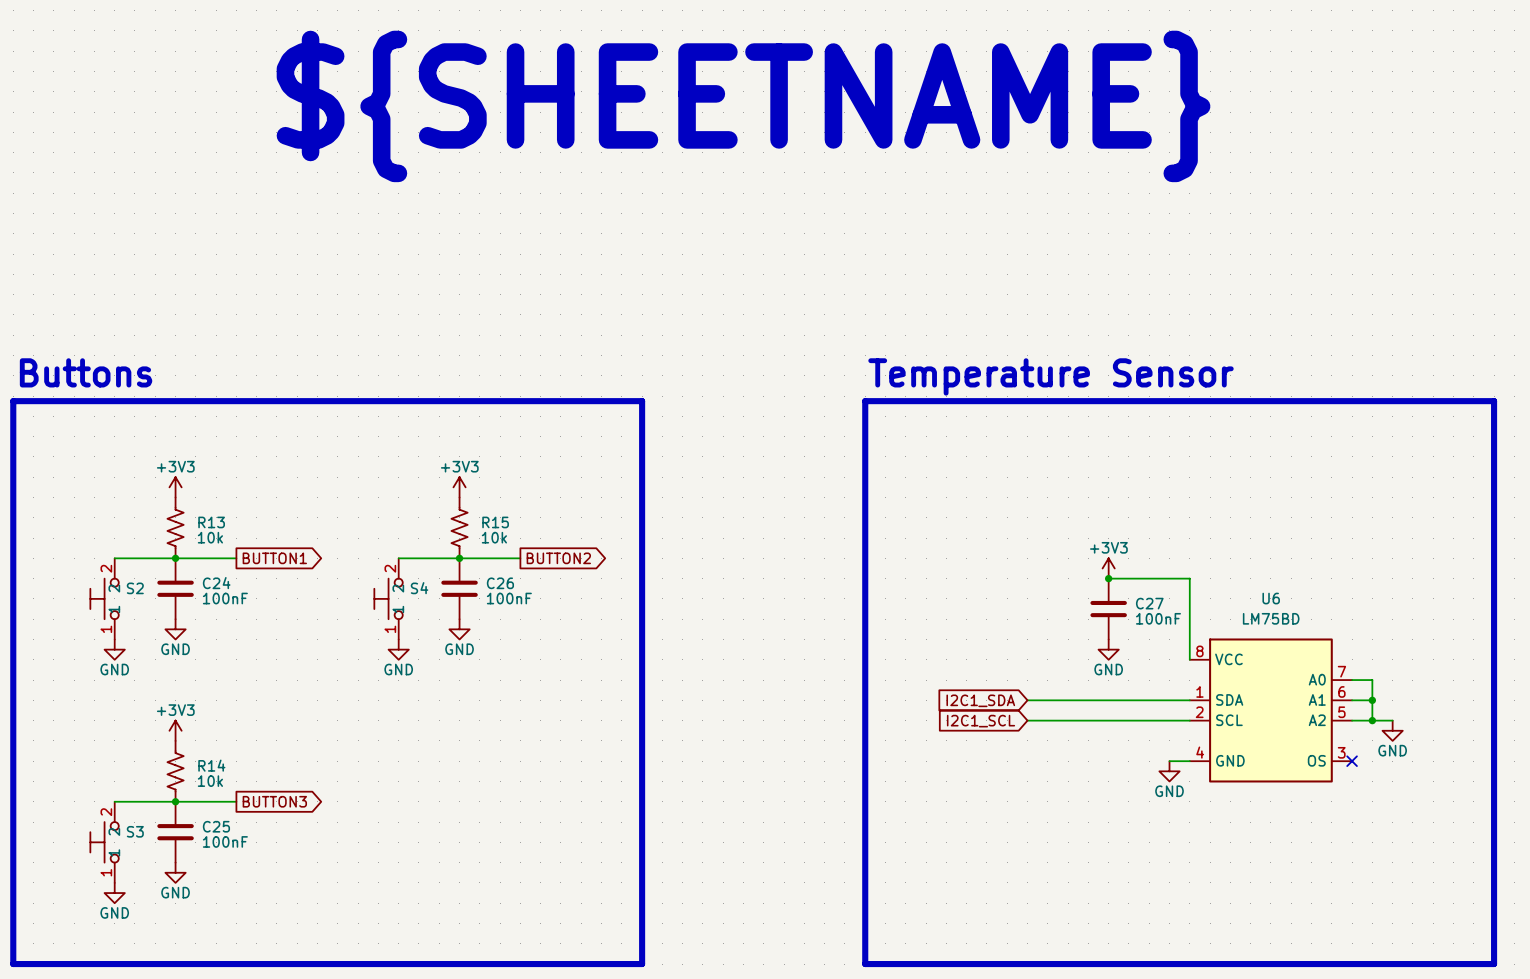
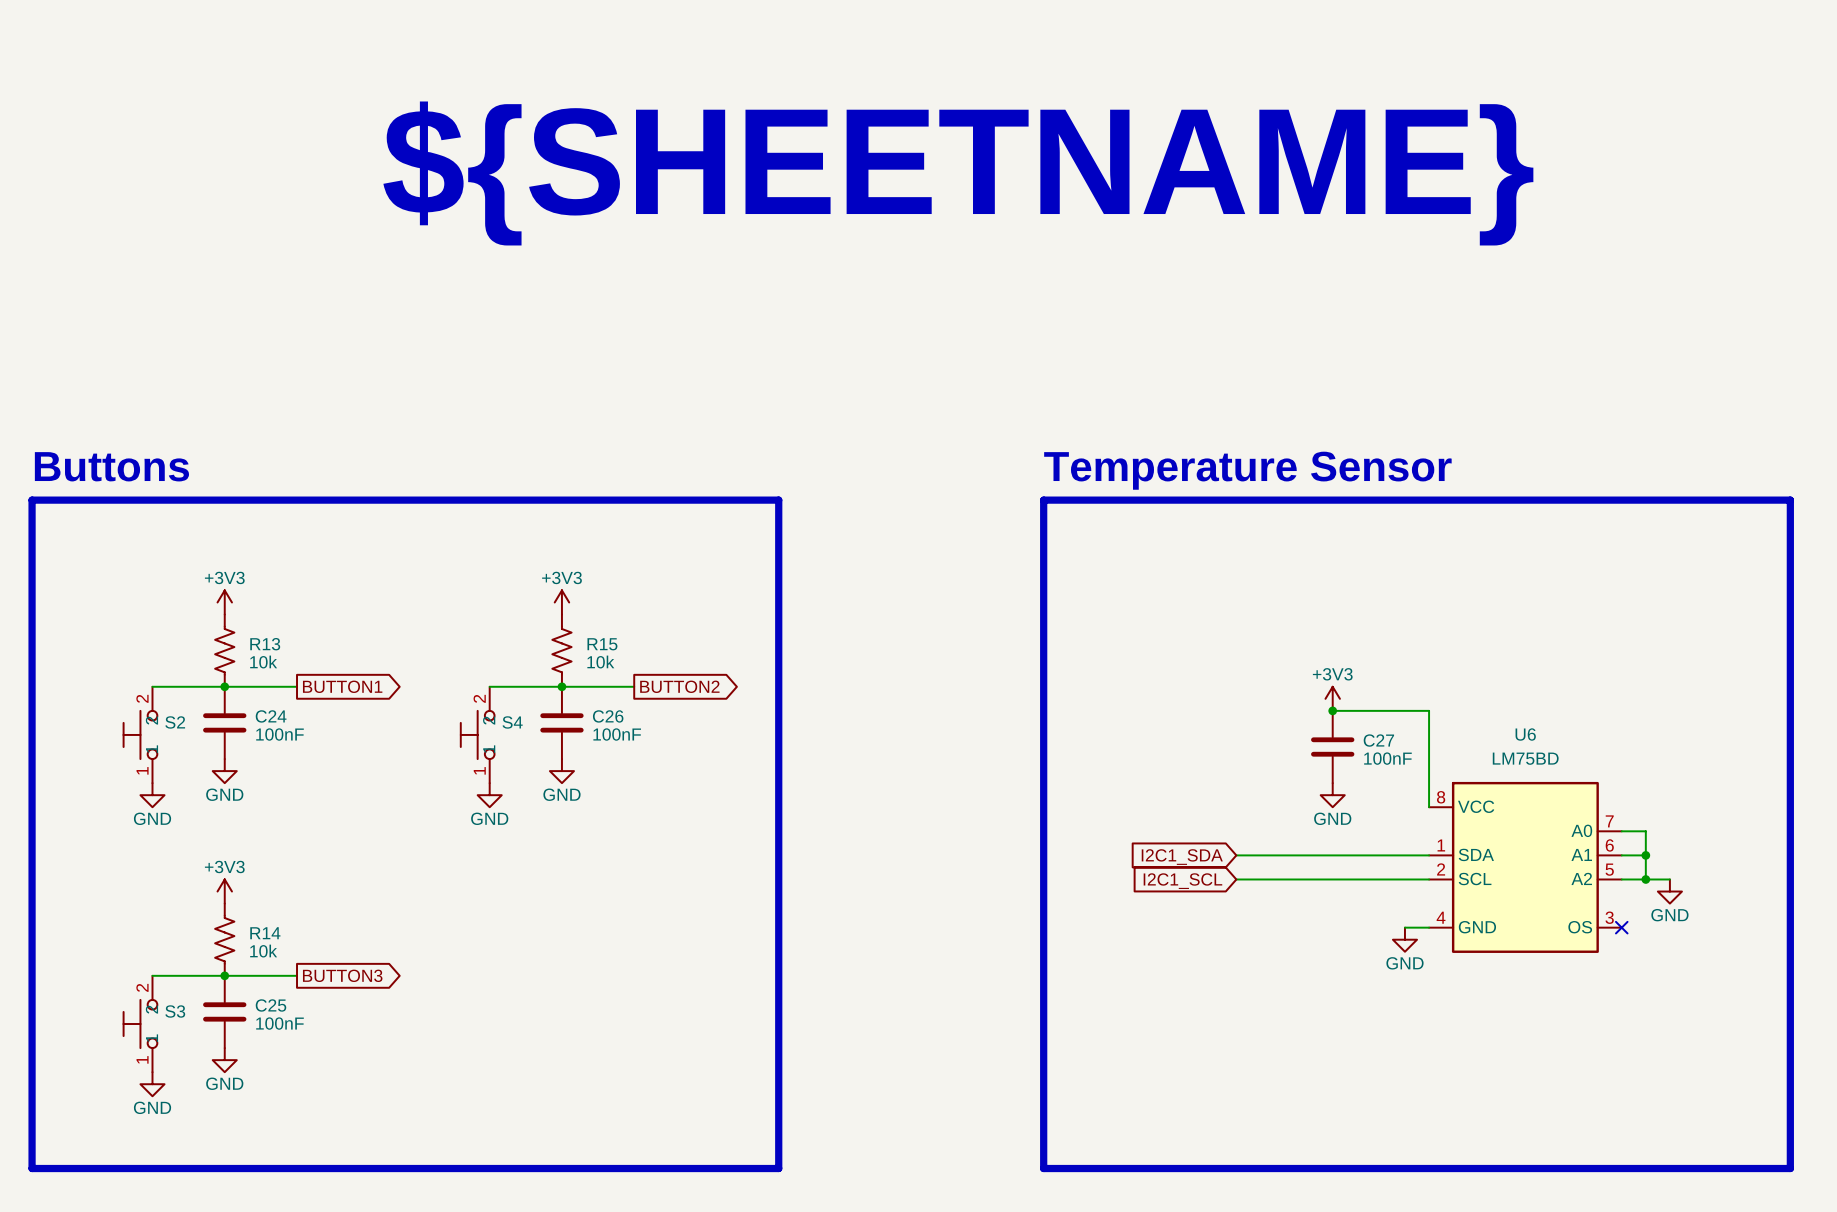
text position: ${SHEETNAME} (743, 106) -> ${SHEETNAME} (958, 173)

